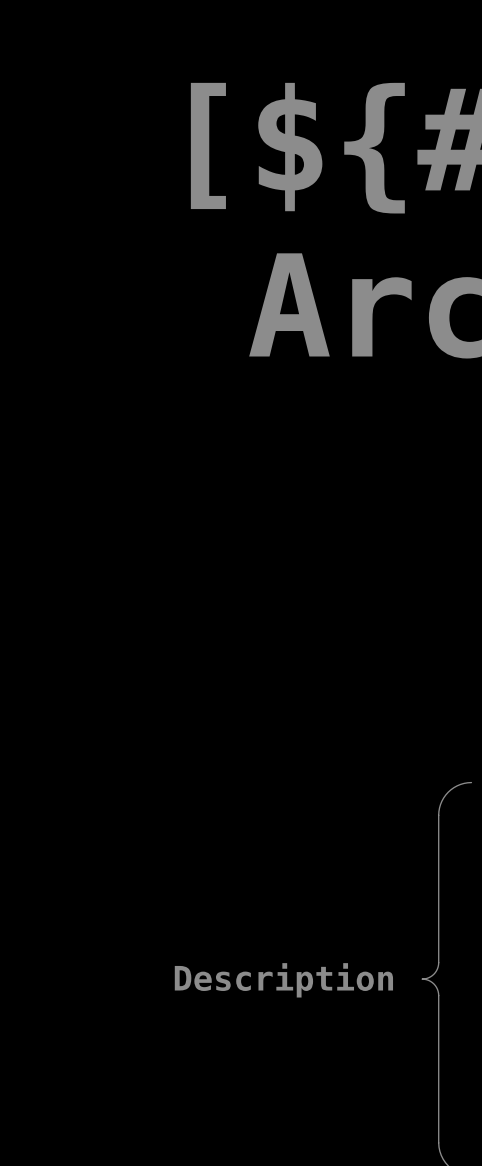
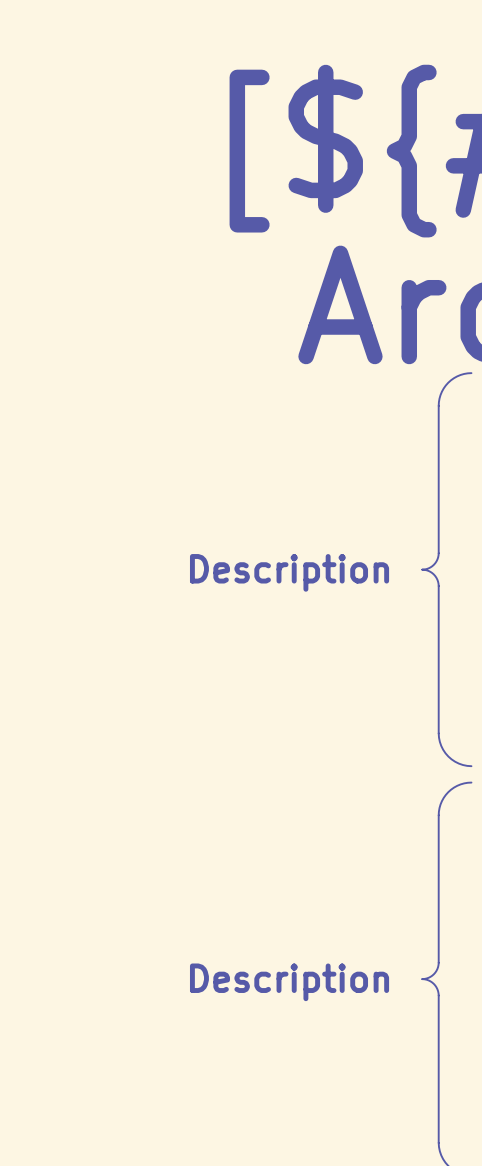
line: none -> (471, 373) (460, 374) (451, 380) (443, 388) (439, 398) (438, 555) (432, 566) (422, 569) (433, 574) (438, 583) (439, 741) (443, 749) (451, 759) (458, 763) (471, 766)
text: none -> Description (289, 572)

